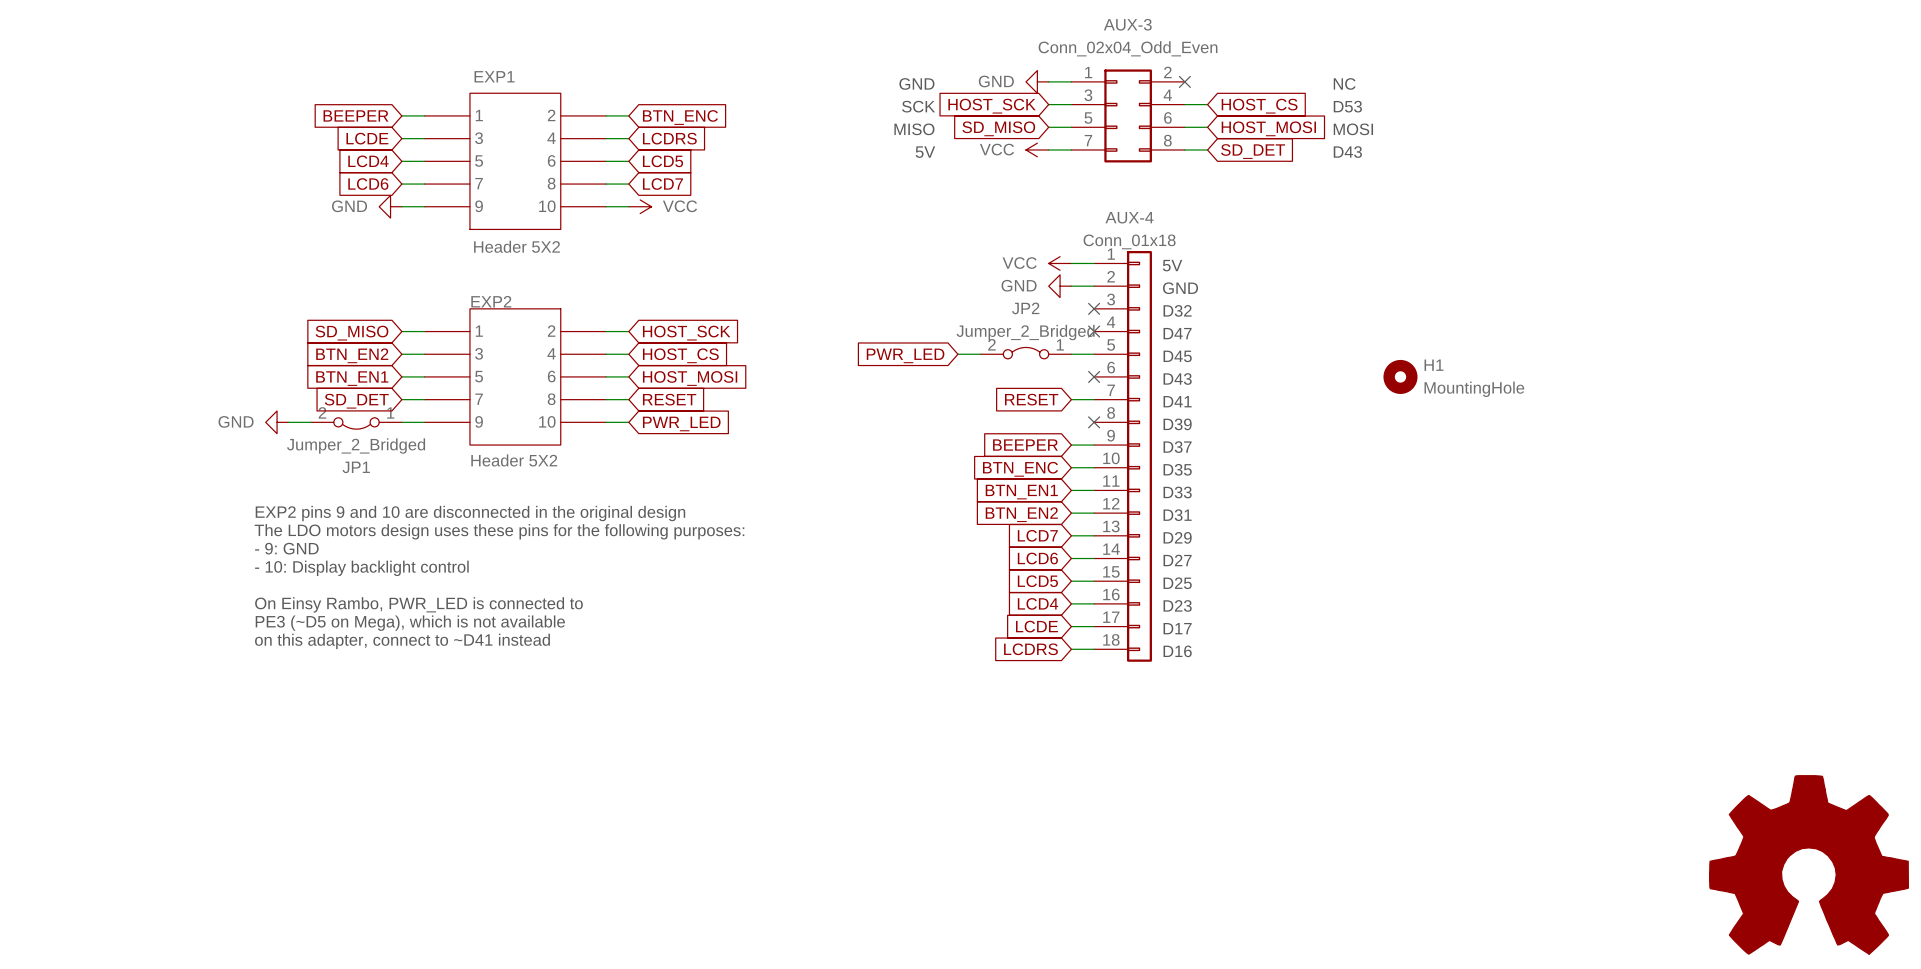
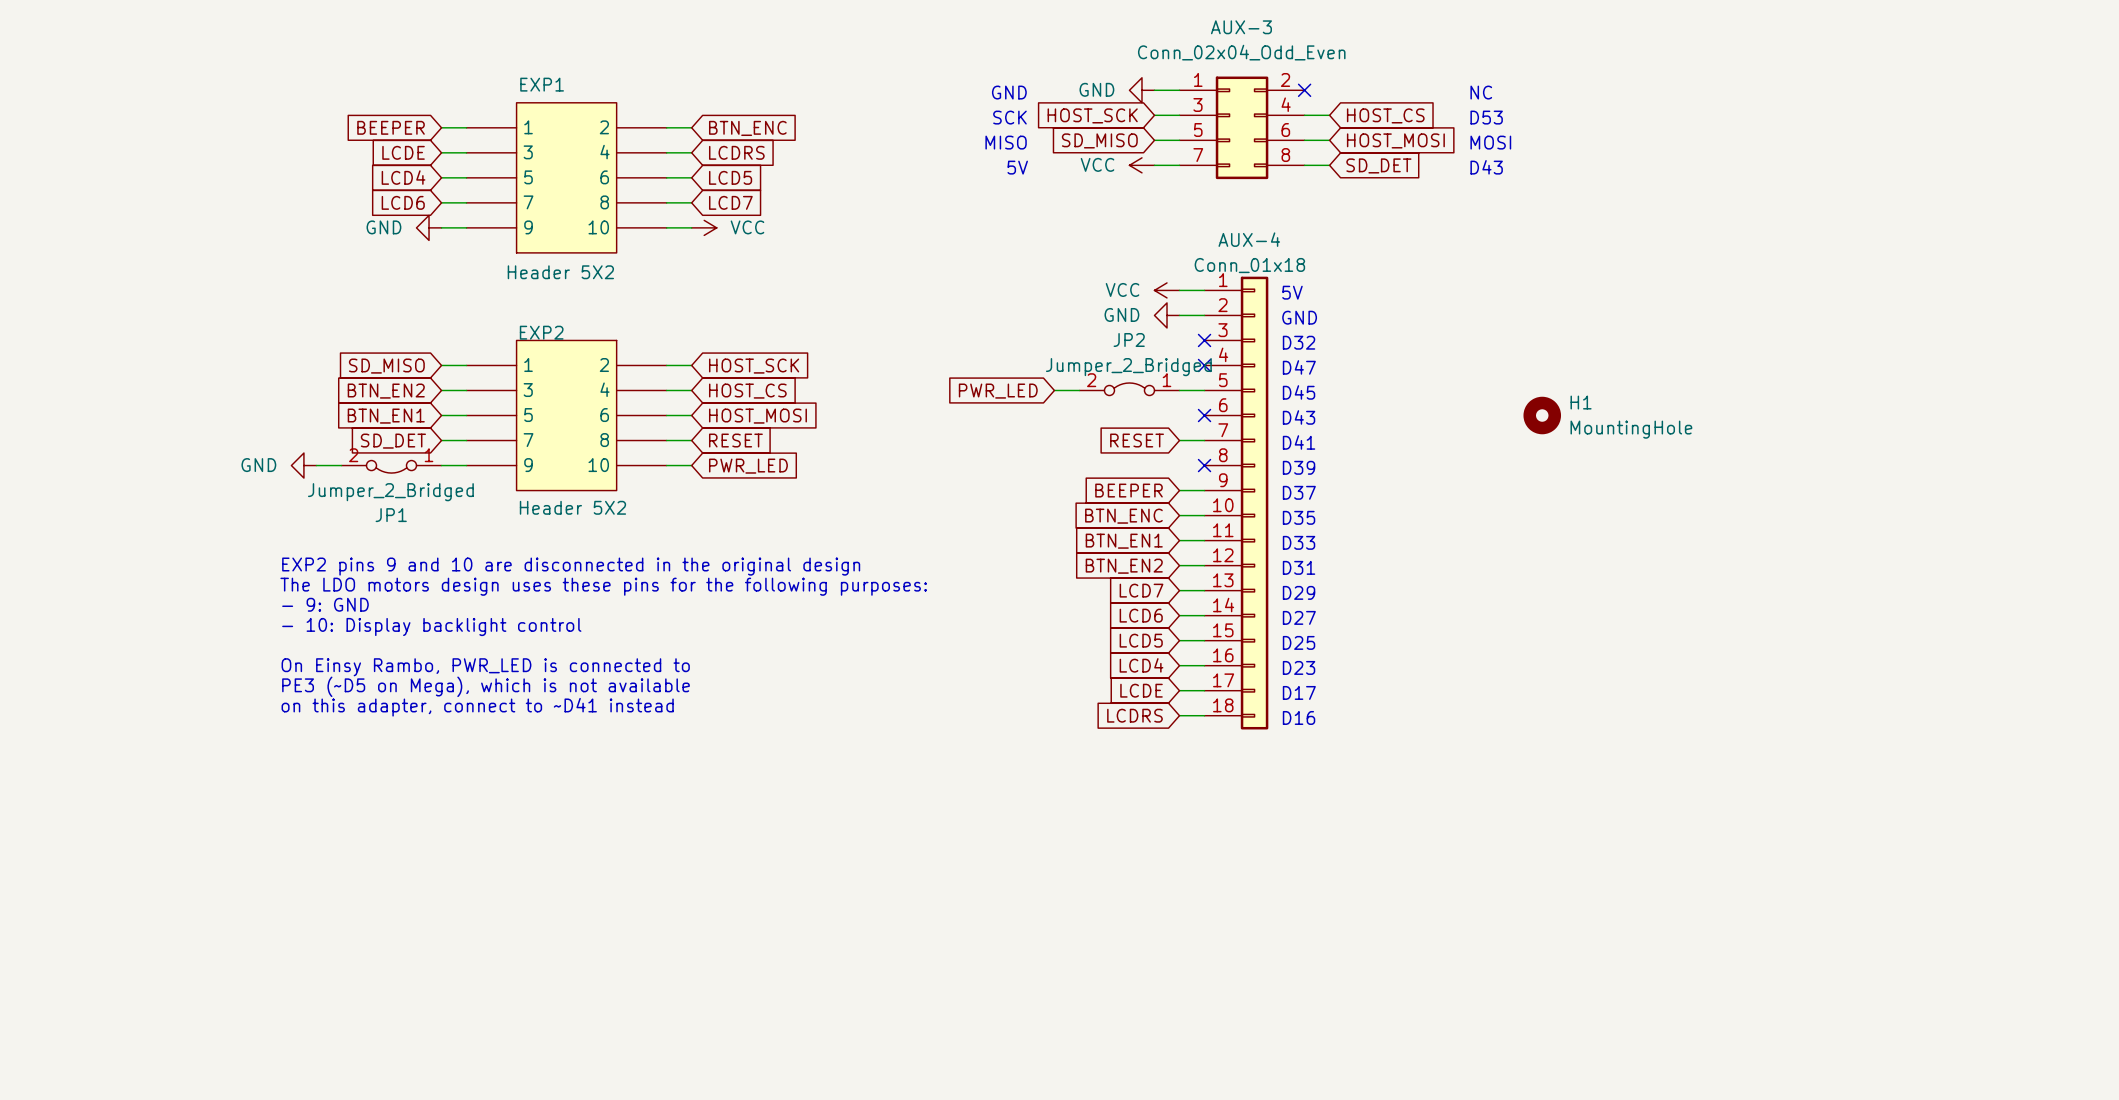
part: (1809, 864) -> none

